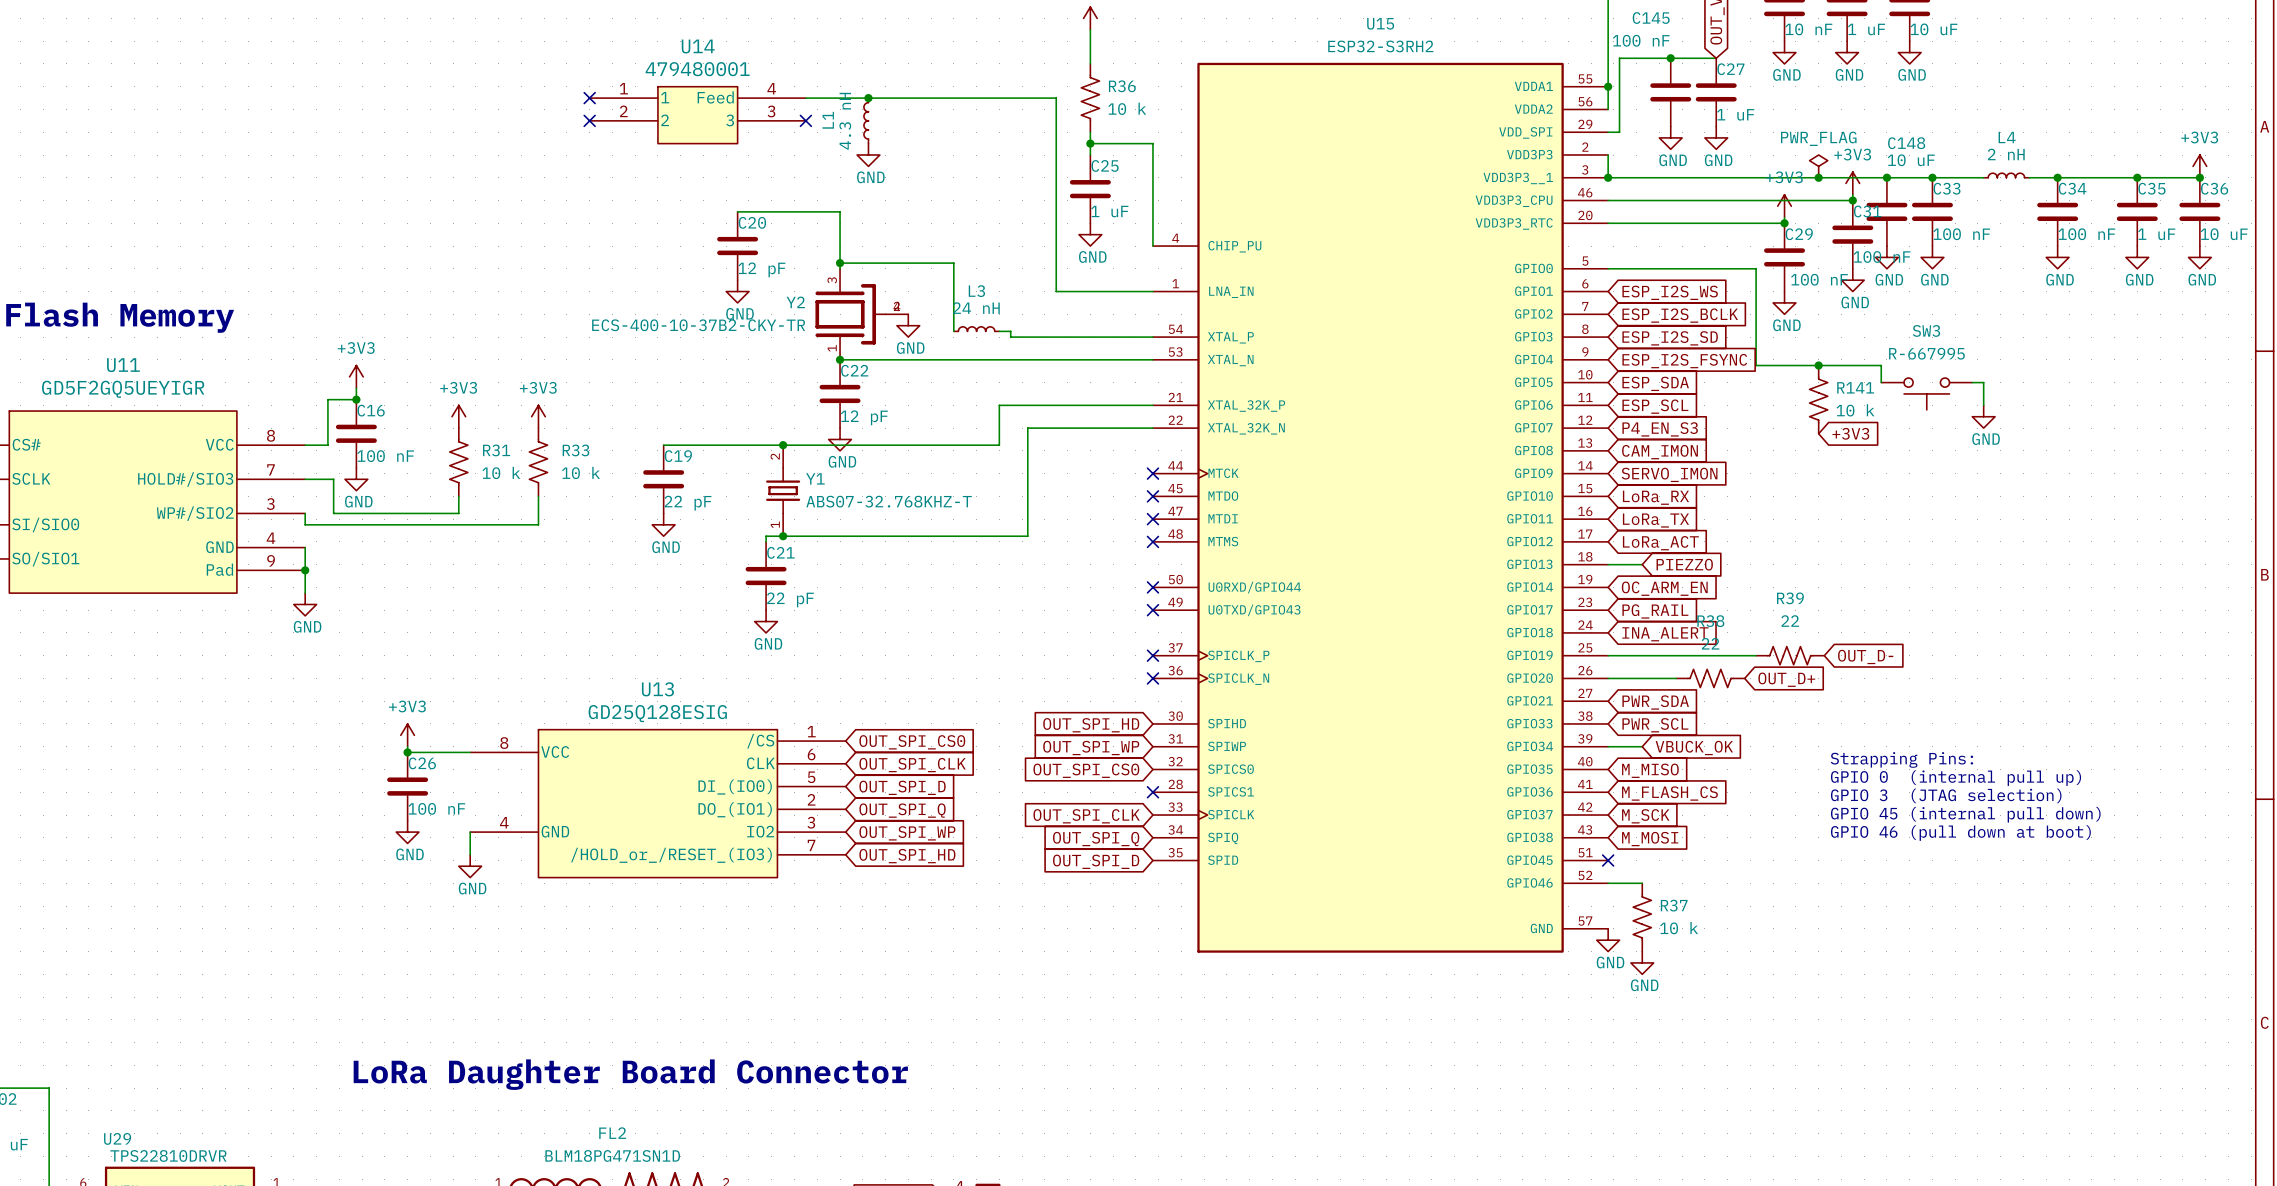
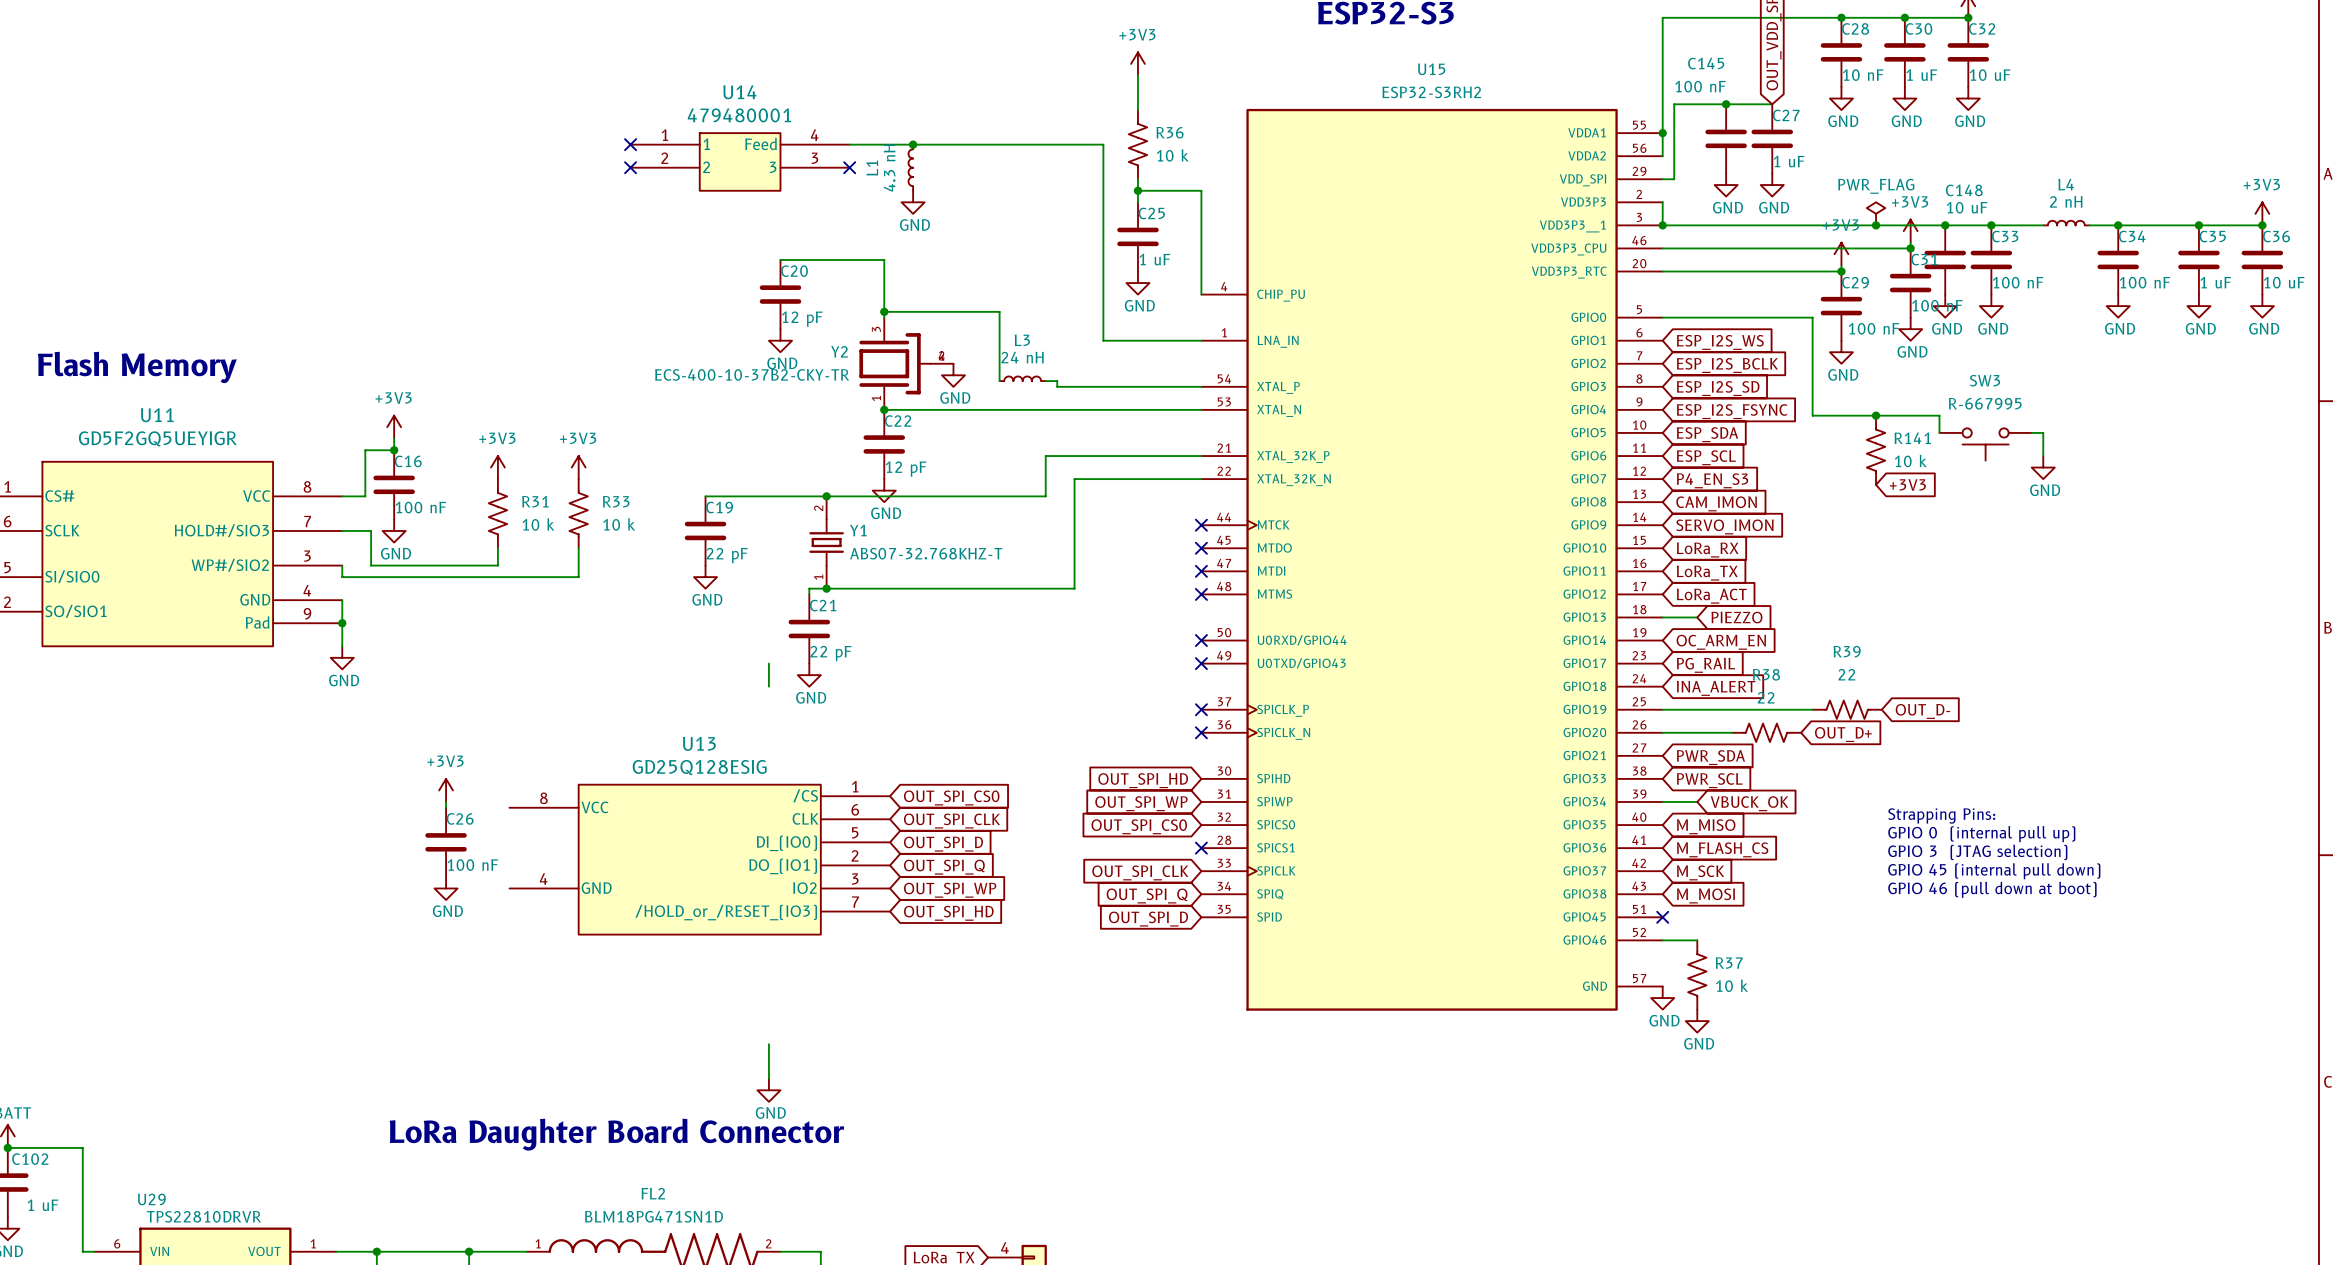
wire: none -> (768, 663) (768, 686)
wire: (407, 752) (470, 752) -> none
junction: (407, 752) -> none
wire: (470, 832) (470, 854) -> none
power symbol: GND (470, 866) -> none
wire: none -> (768, 1044) (768, 1078)
power symbol: none -> GND (768, 1090)

